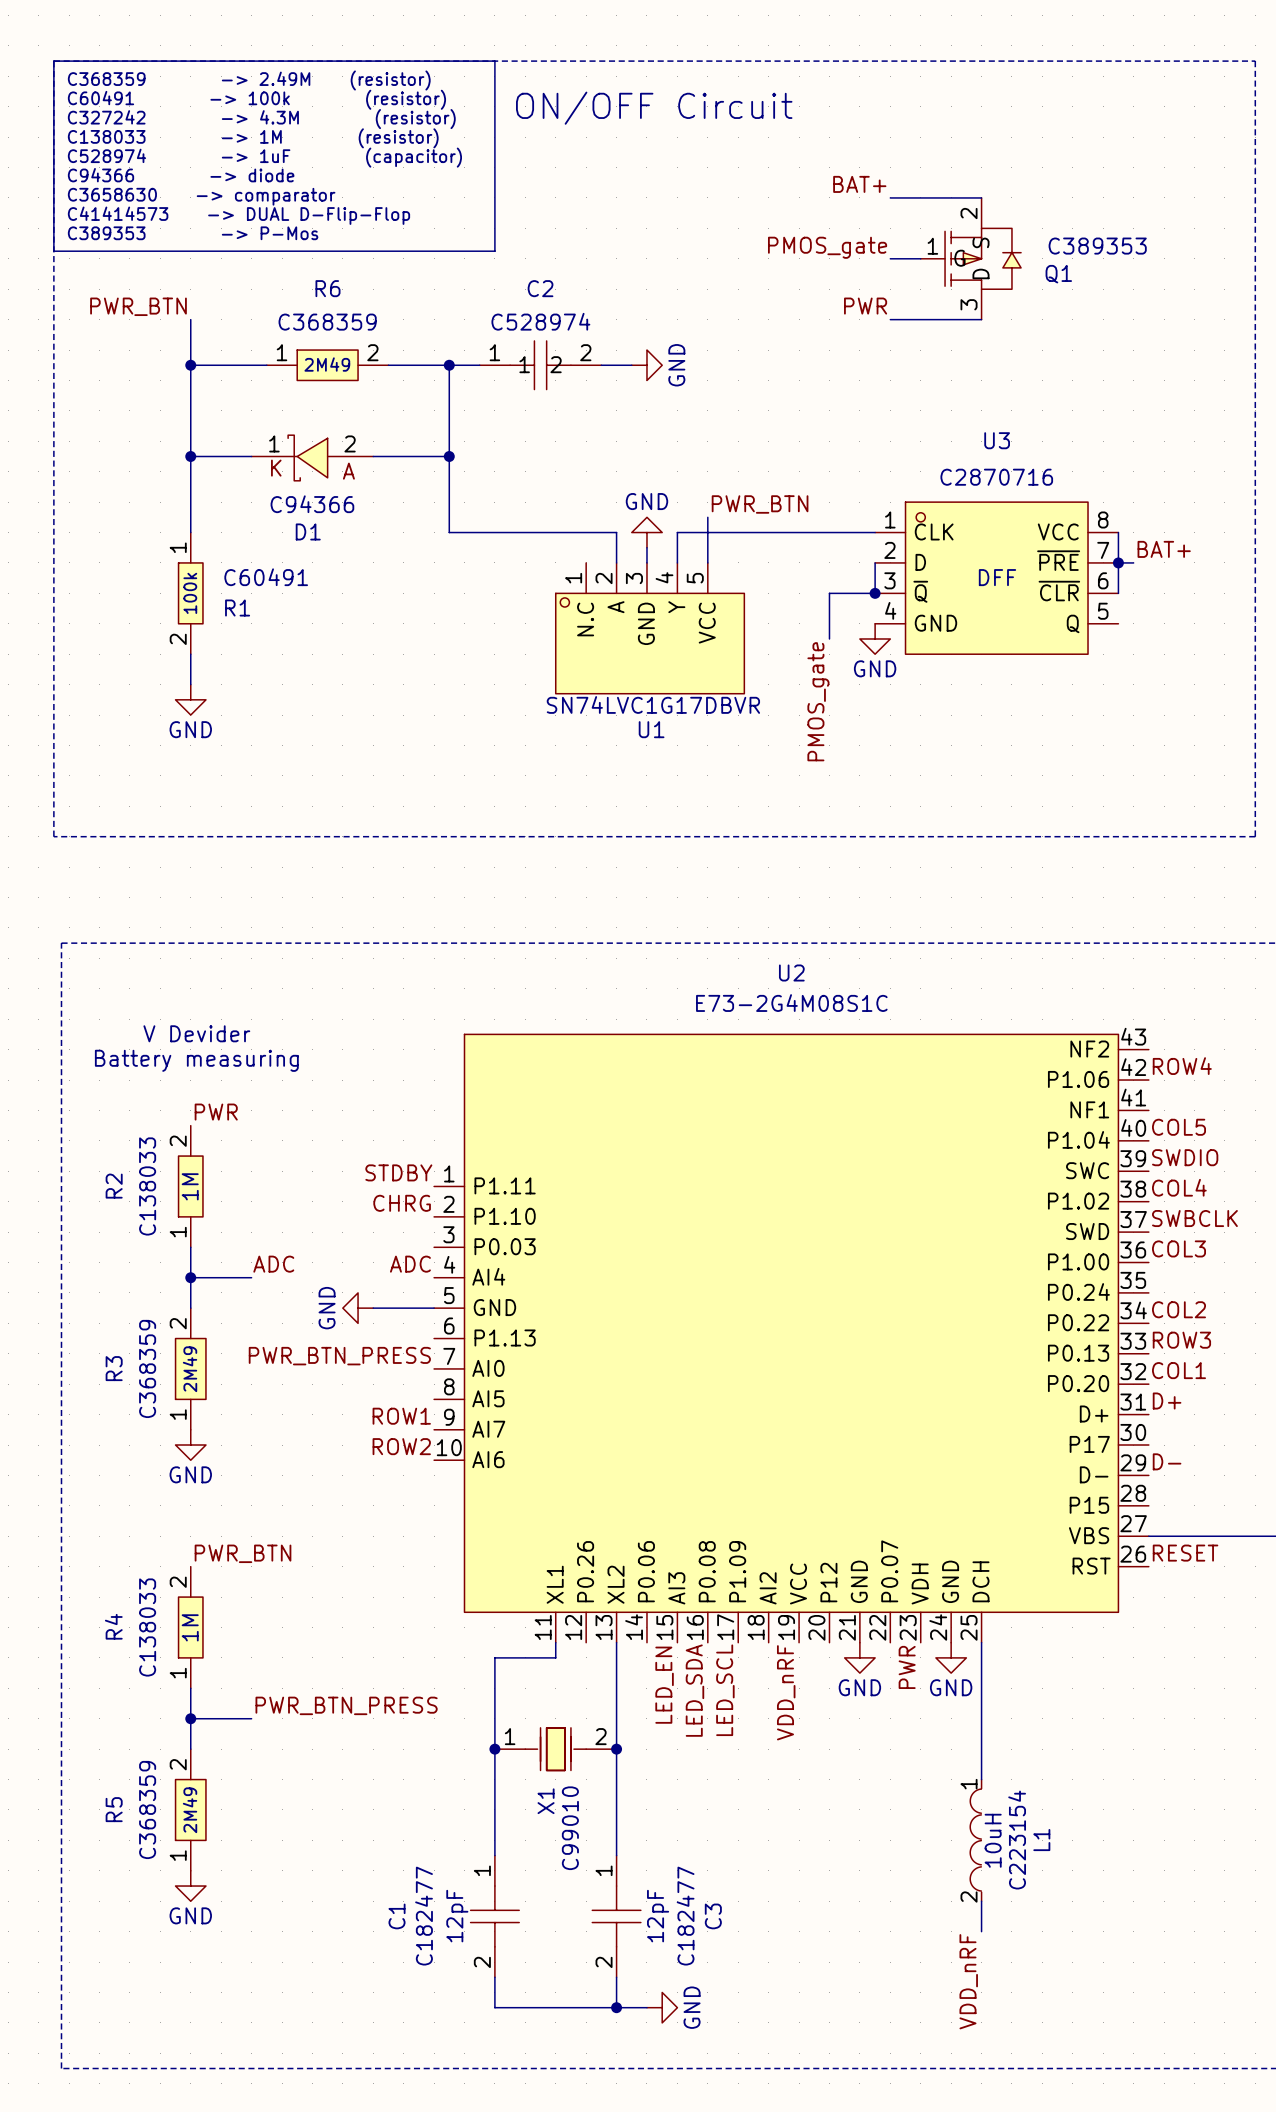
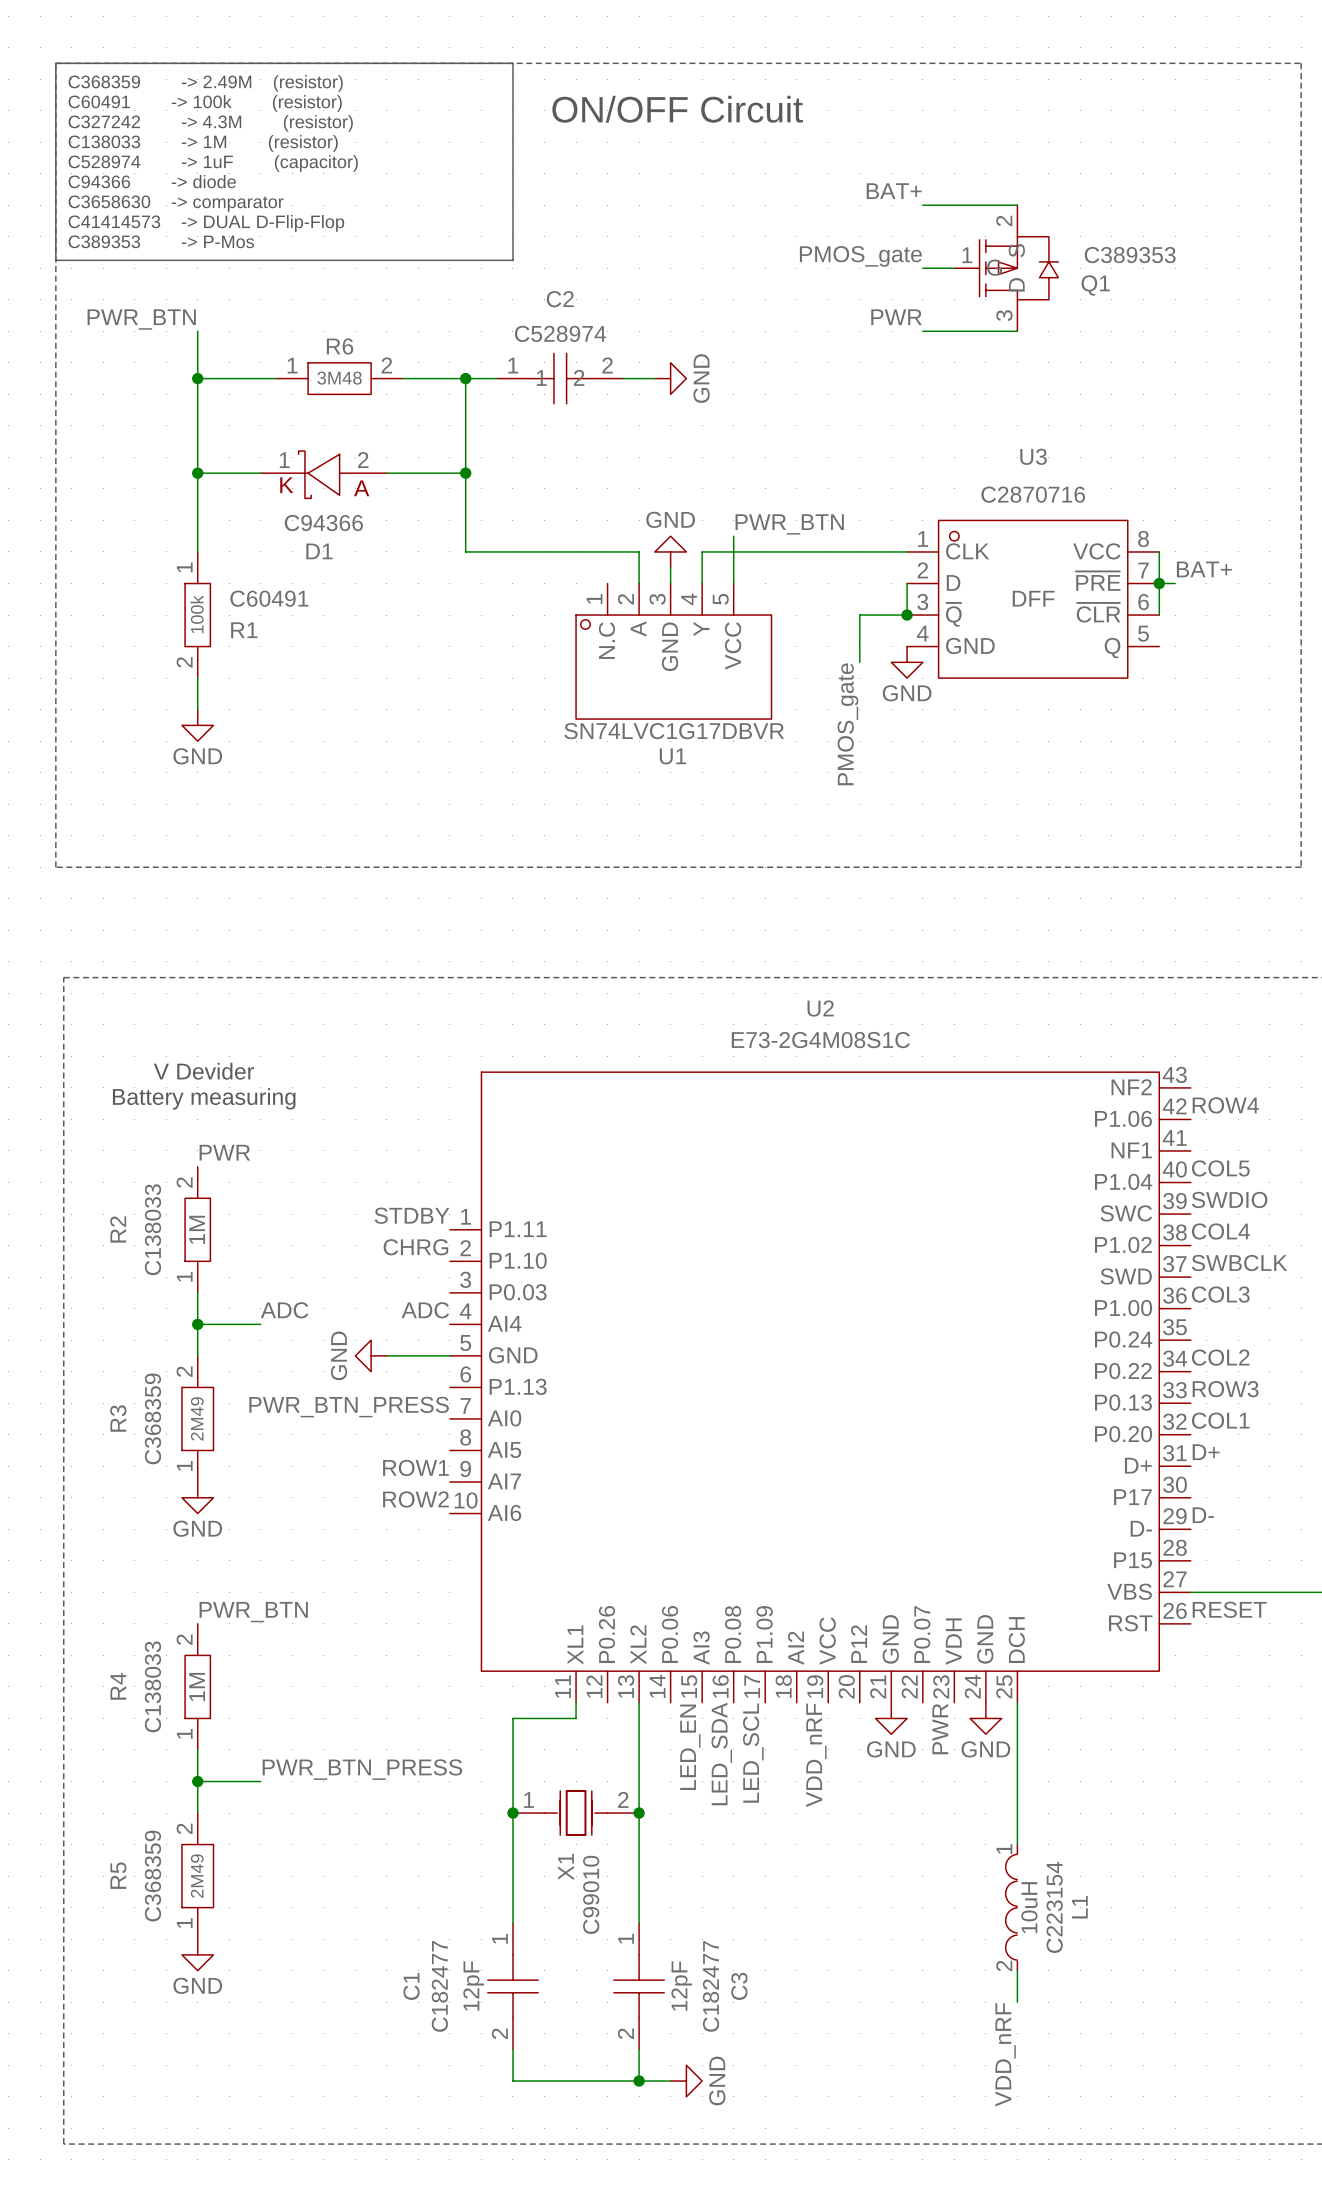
R6 name position: R6 (327, 288) -> R6 (340, 346)
R6 text: C368359 (327, 322) -> none
R6 text: 2M49 (327, 364) -> 3M48 (339, 378)

